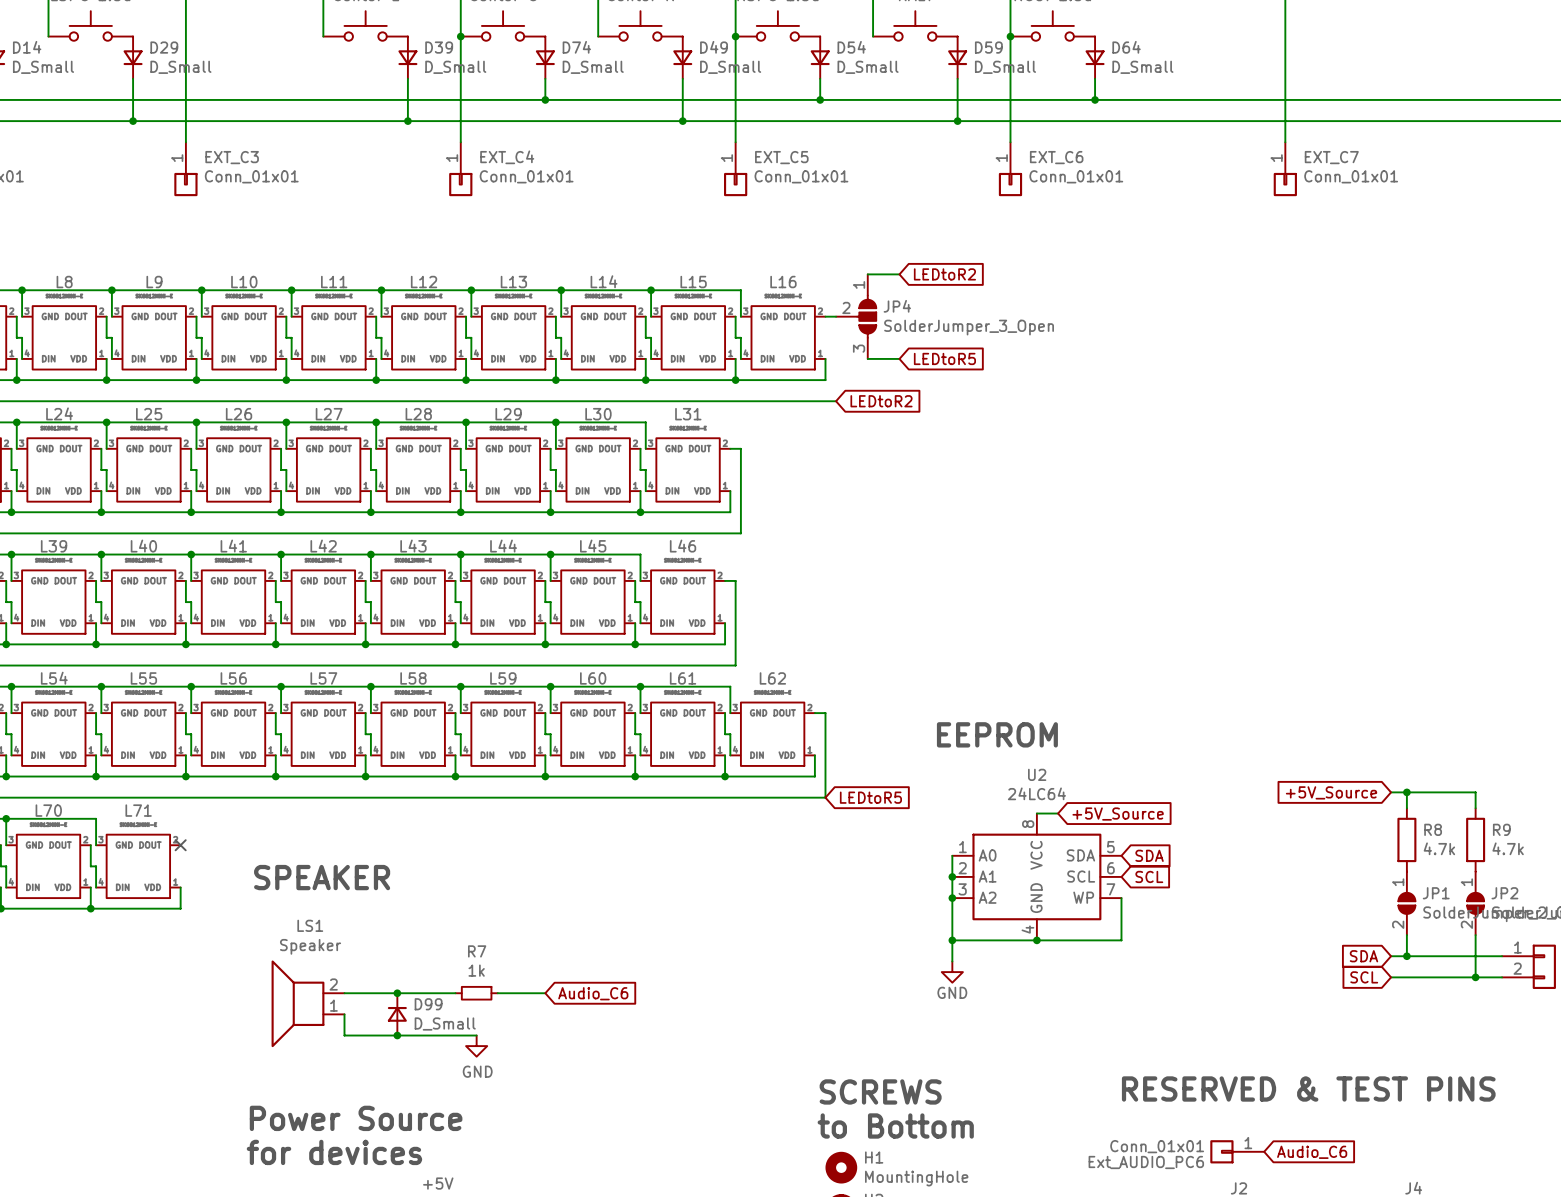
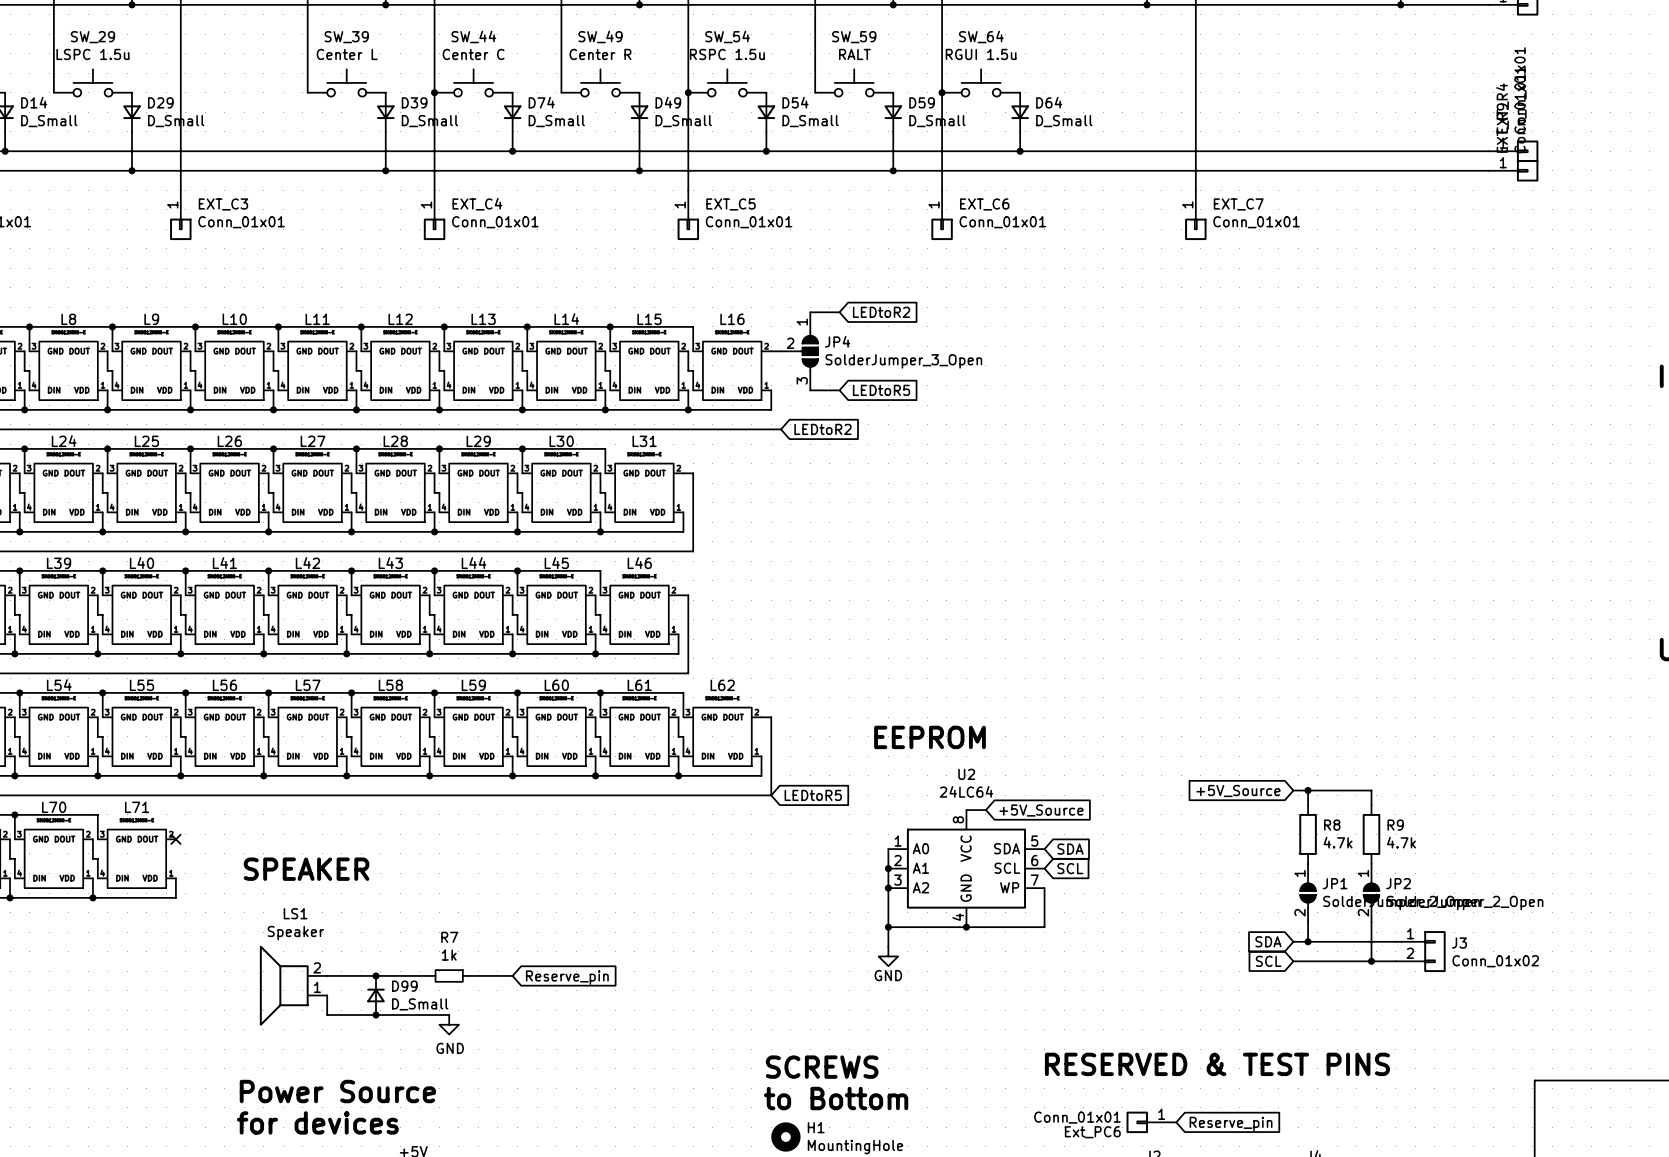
global label: Audio_C6 (593, 993) -> Reserve_pin (567, 977)
global label: Audio_C6 (1312, 1152) -> Reserve_pin (1231, 1123)
Ext_AUDIO_PC6 name: Ext_AUDIO_PC6 (1146, 1162) -> Ext_PC6 (1092, 1132)

